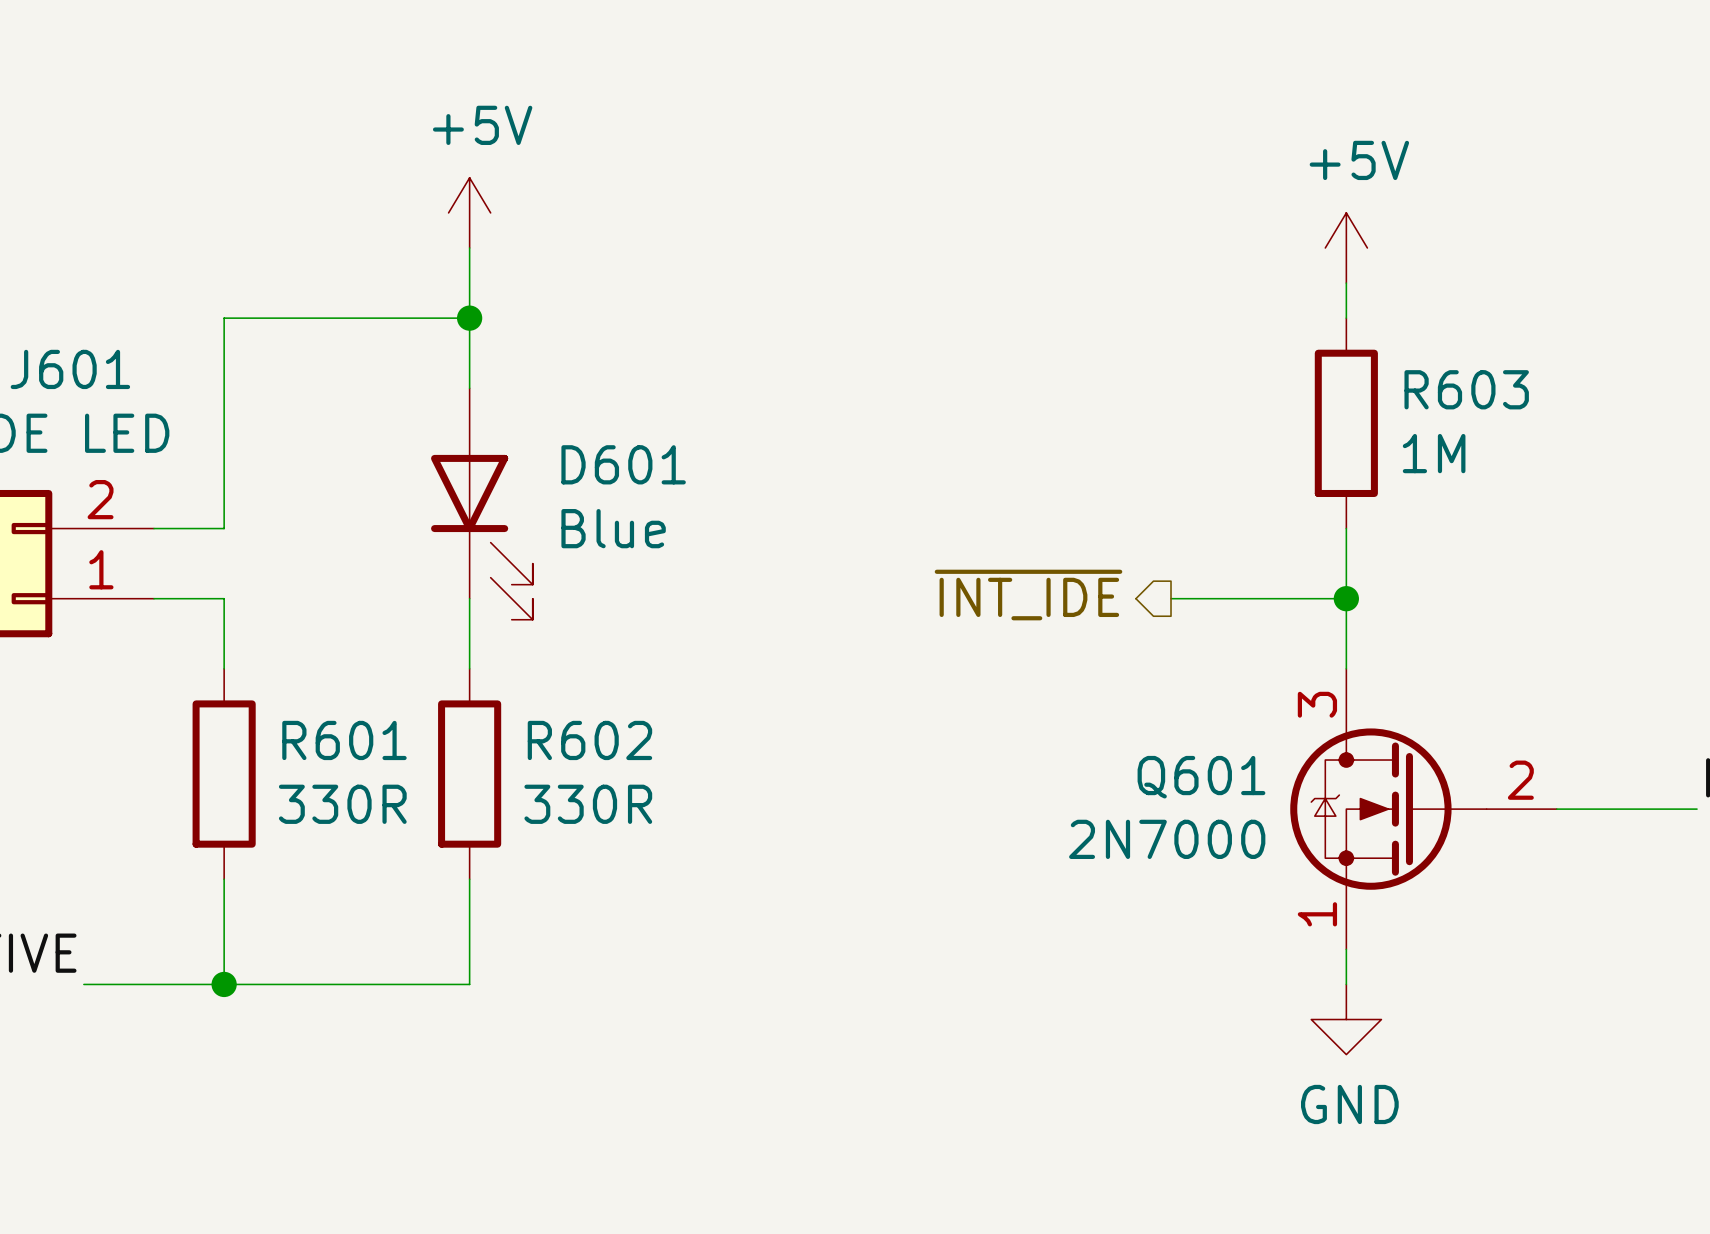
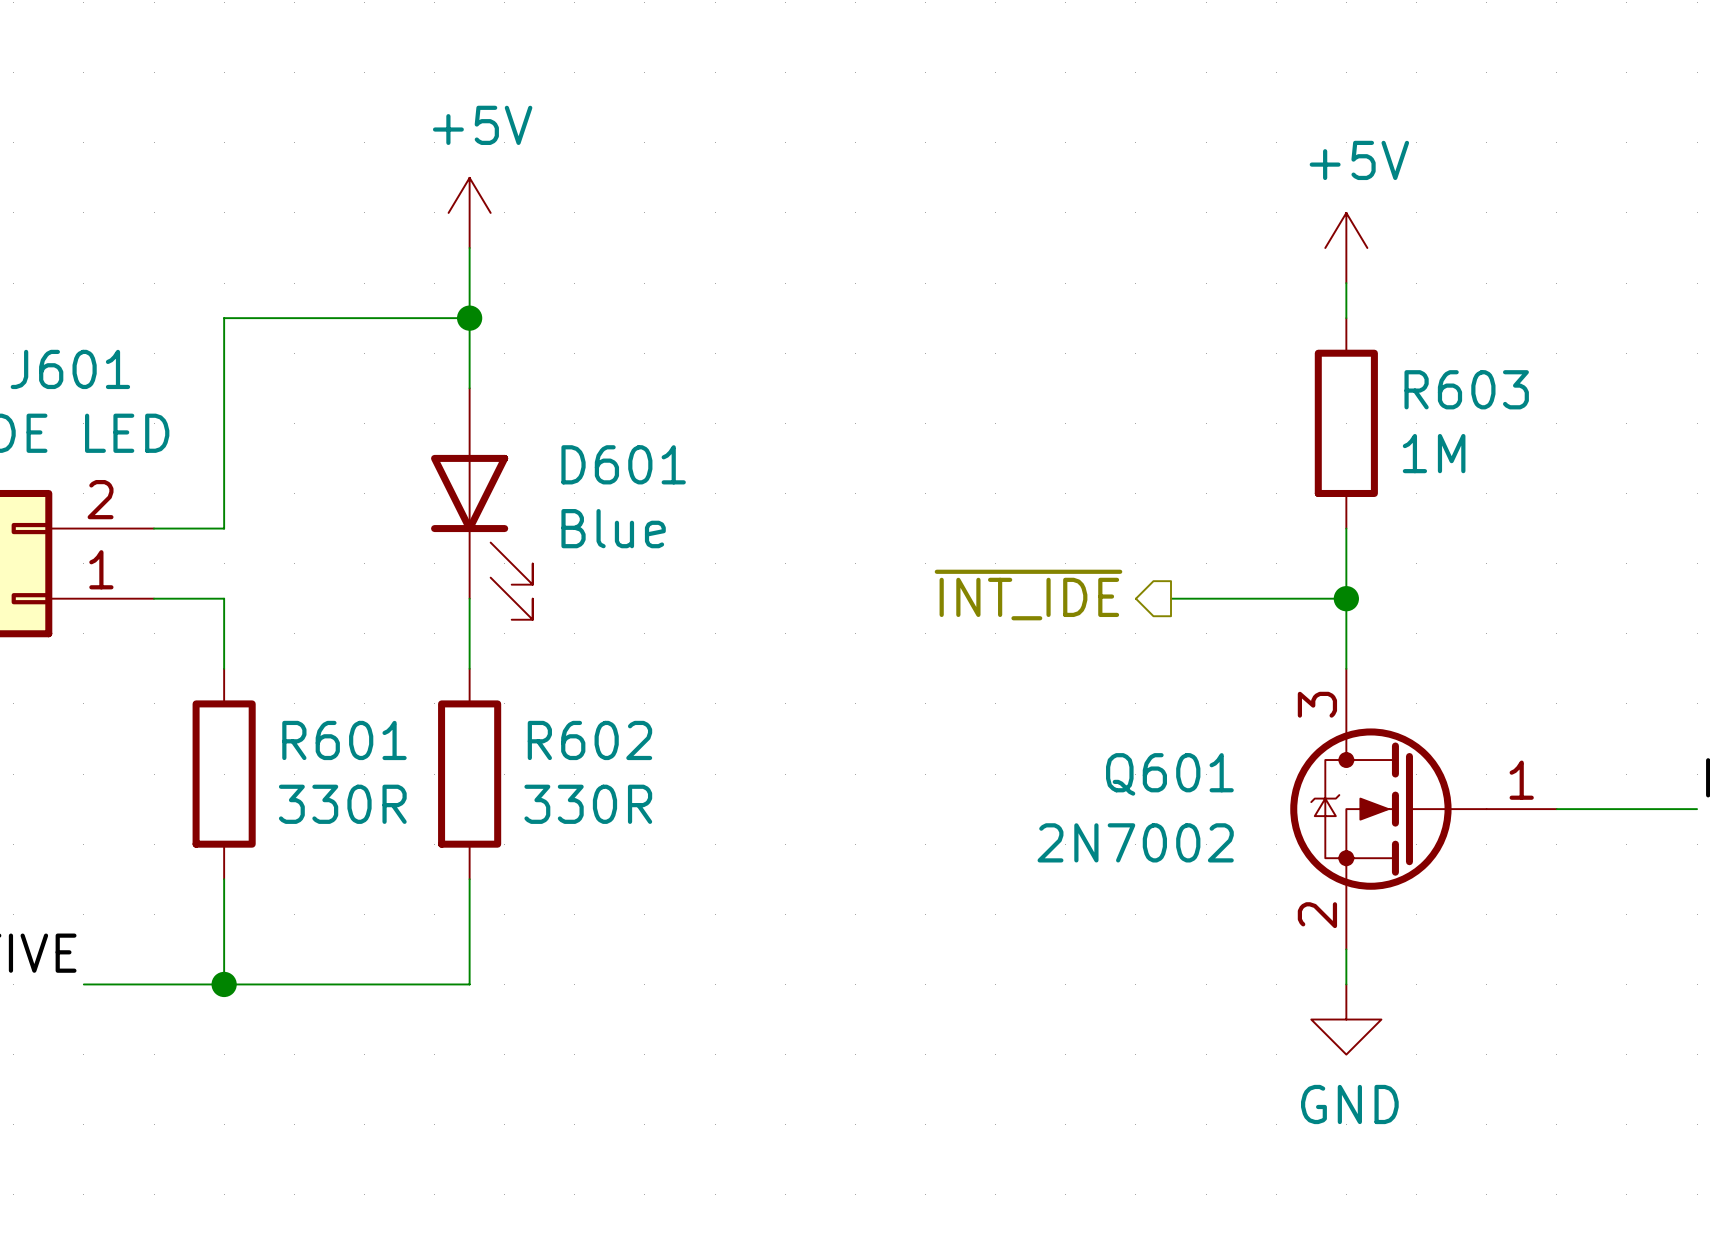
Q601 name position: Q601 (1201, 777) -> Q601 (1169, 774)
Q601 pin number: 2 (1520, 780) -> 1 (1521, 780)
Q601 value: 2N7000 (1167, 839) -> 2N7002 (1135, 842)
Q601 pin number: 1 (1317, 914) -> 2 (1317, 915)

